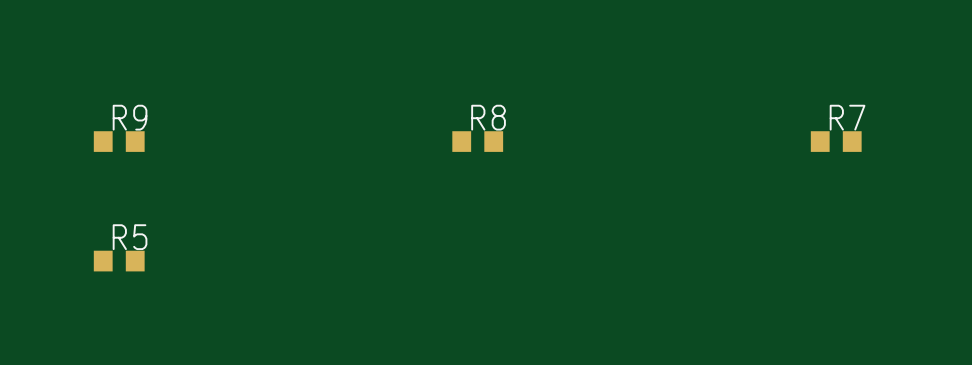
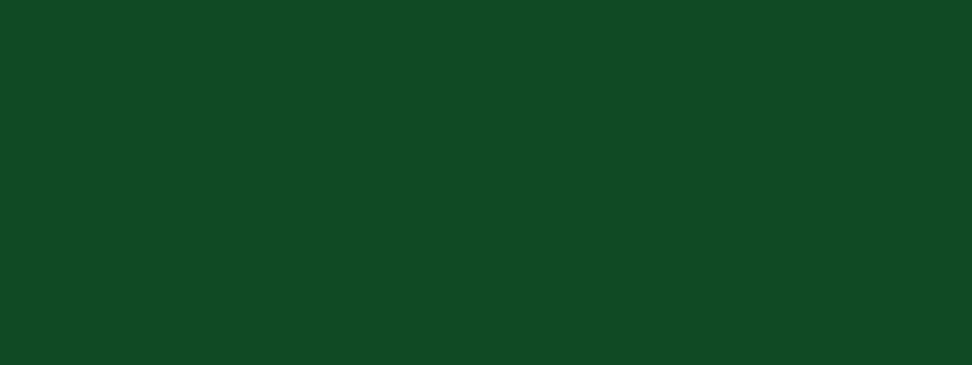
R9: (119, 141) -> none
R8: (477, 141) -> none
R7: (836, 141) -> none
R5: (119, 261) -> none

